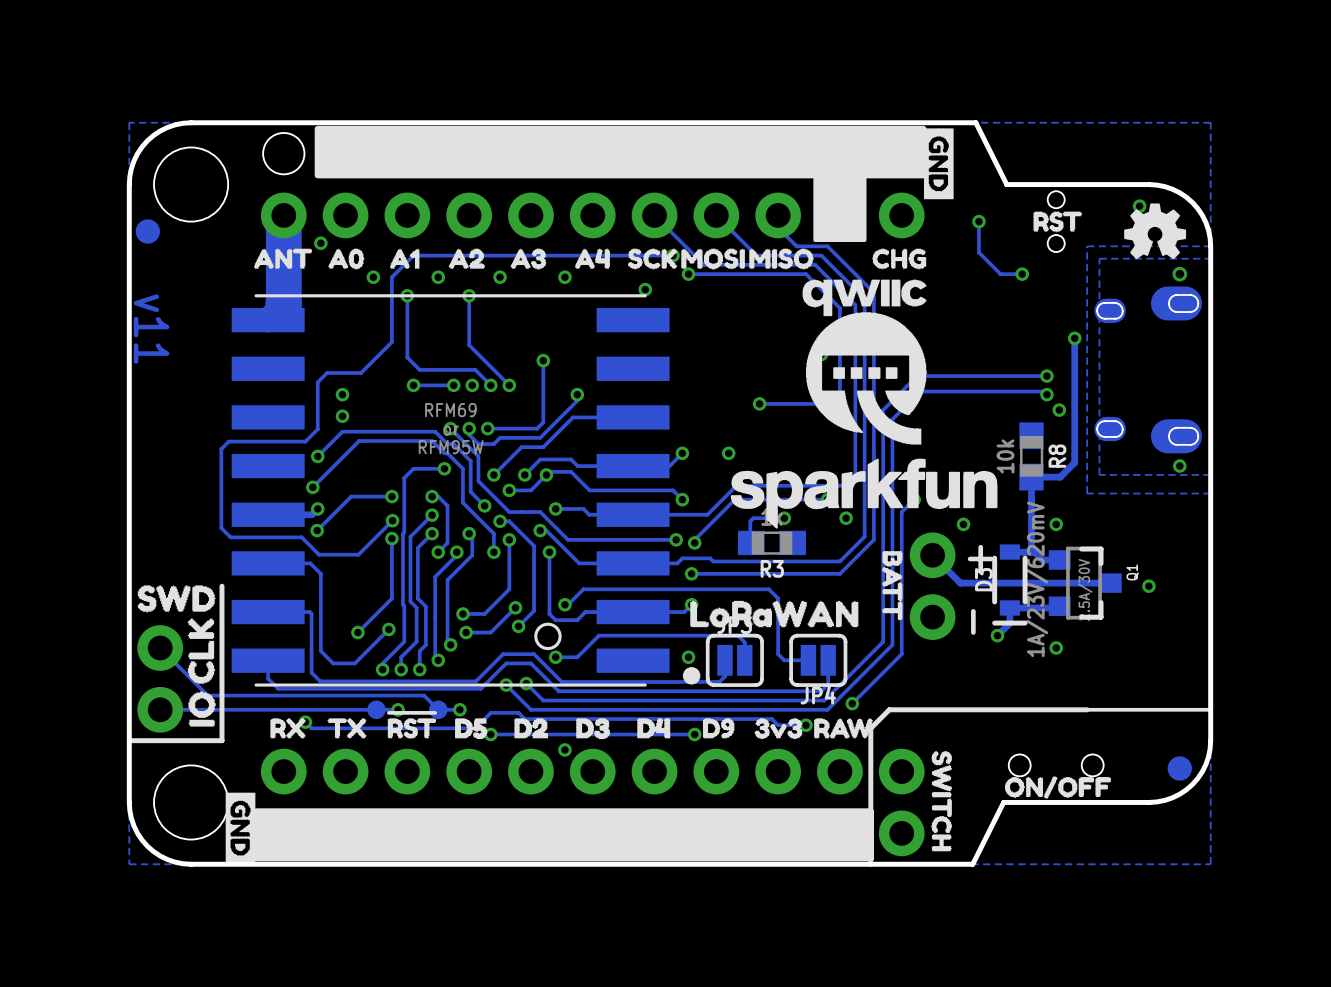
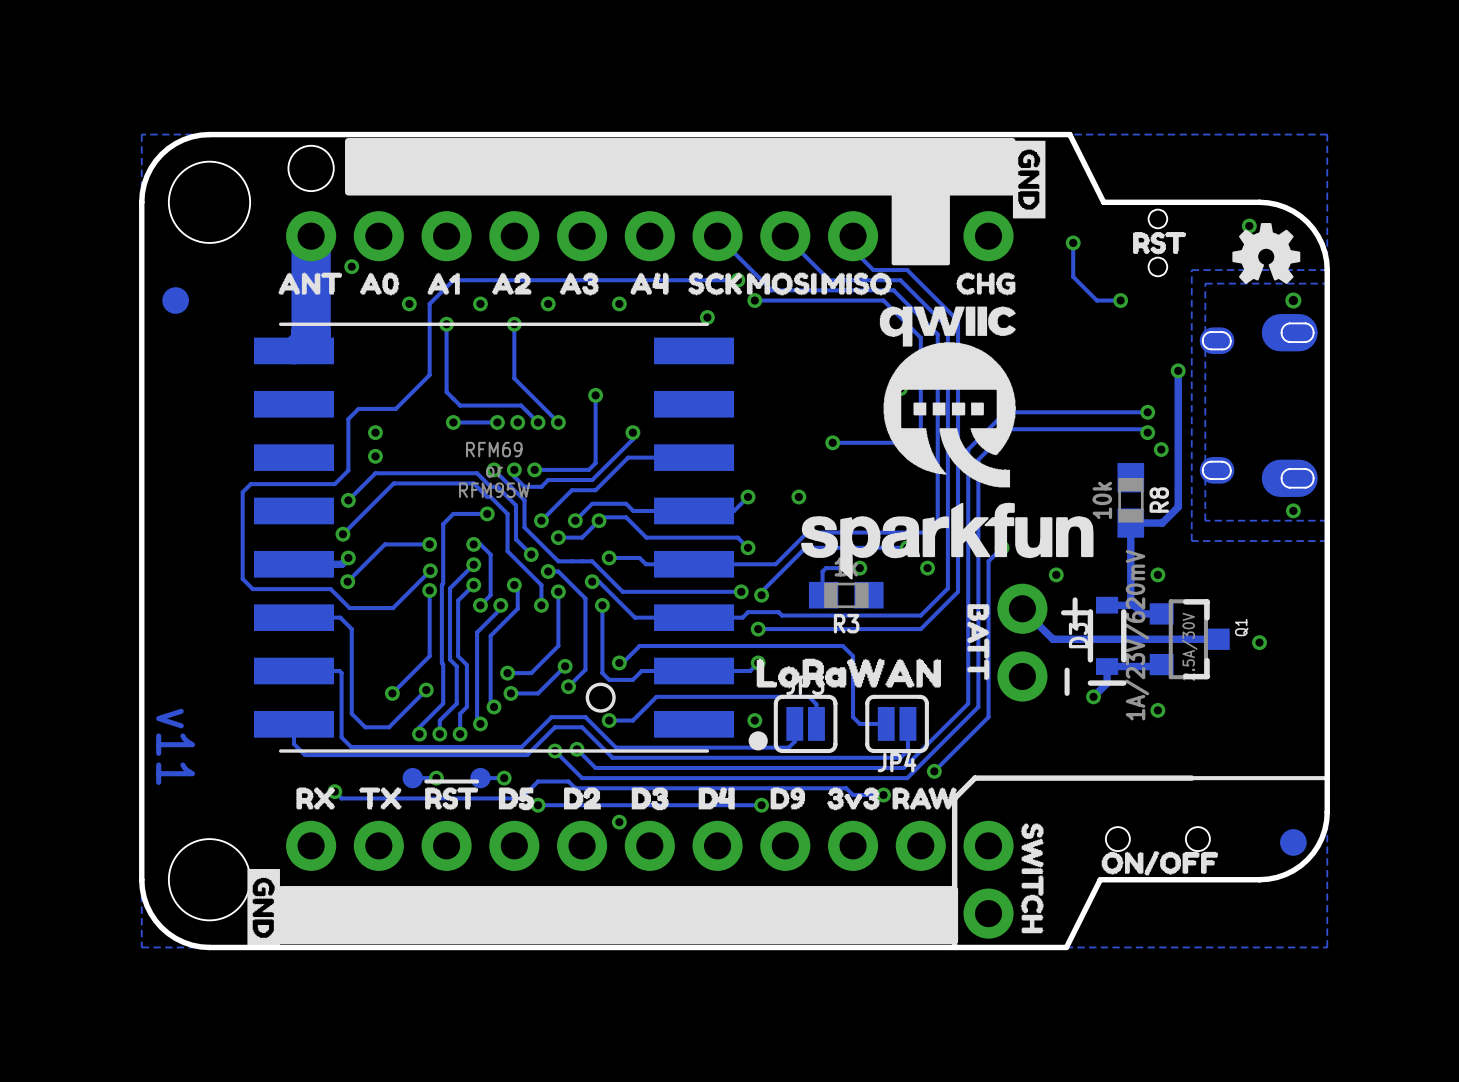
part position: (147, 231) -> (175, 300)
text position: v11 (151, 329) -> v11 (175, 746)
drawing: [137, 585, 216, 727] -> none
line: (222, 586) (222, 740) (129, 740) -> none
track: (160, 647) (207, 695) (424, 695) (438, 709) -> none
part: (160, 647) -> none
part: (160, 709) -> none
track: (376, 709) (160, 709) -> none

